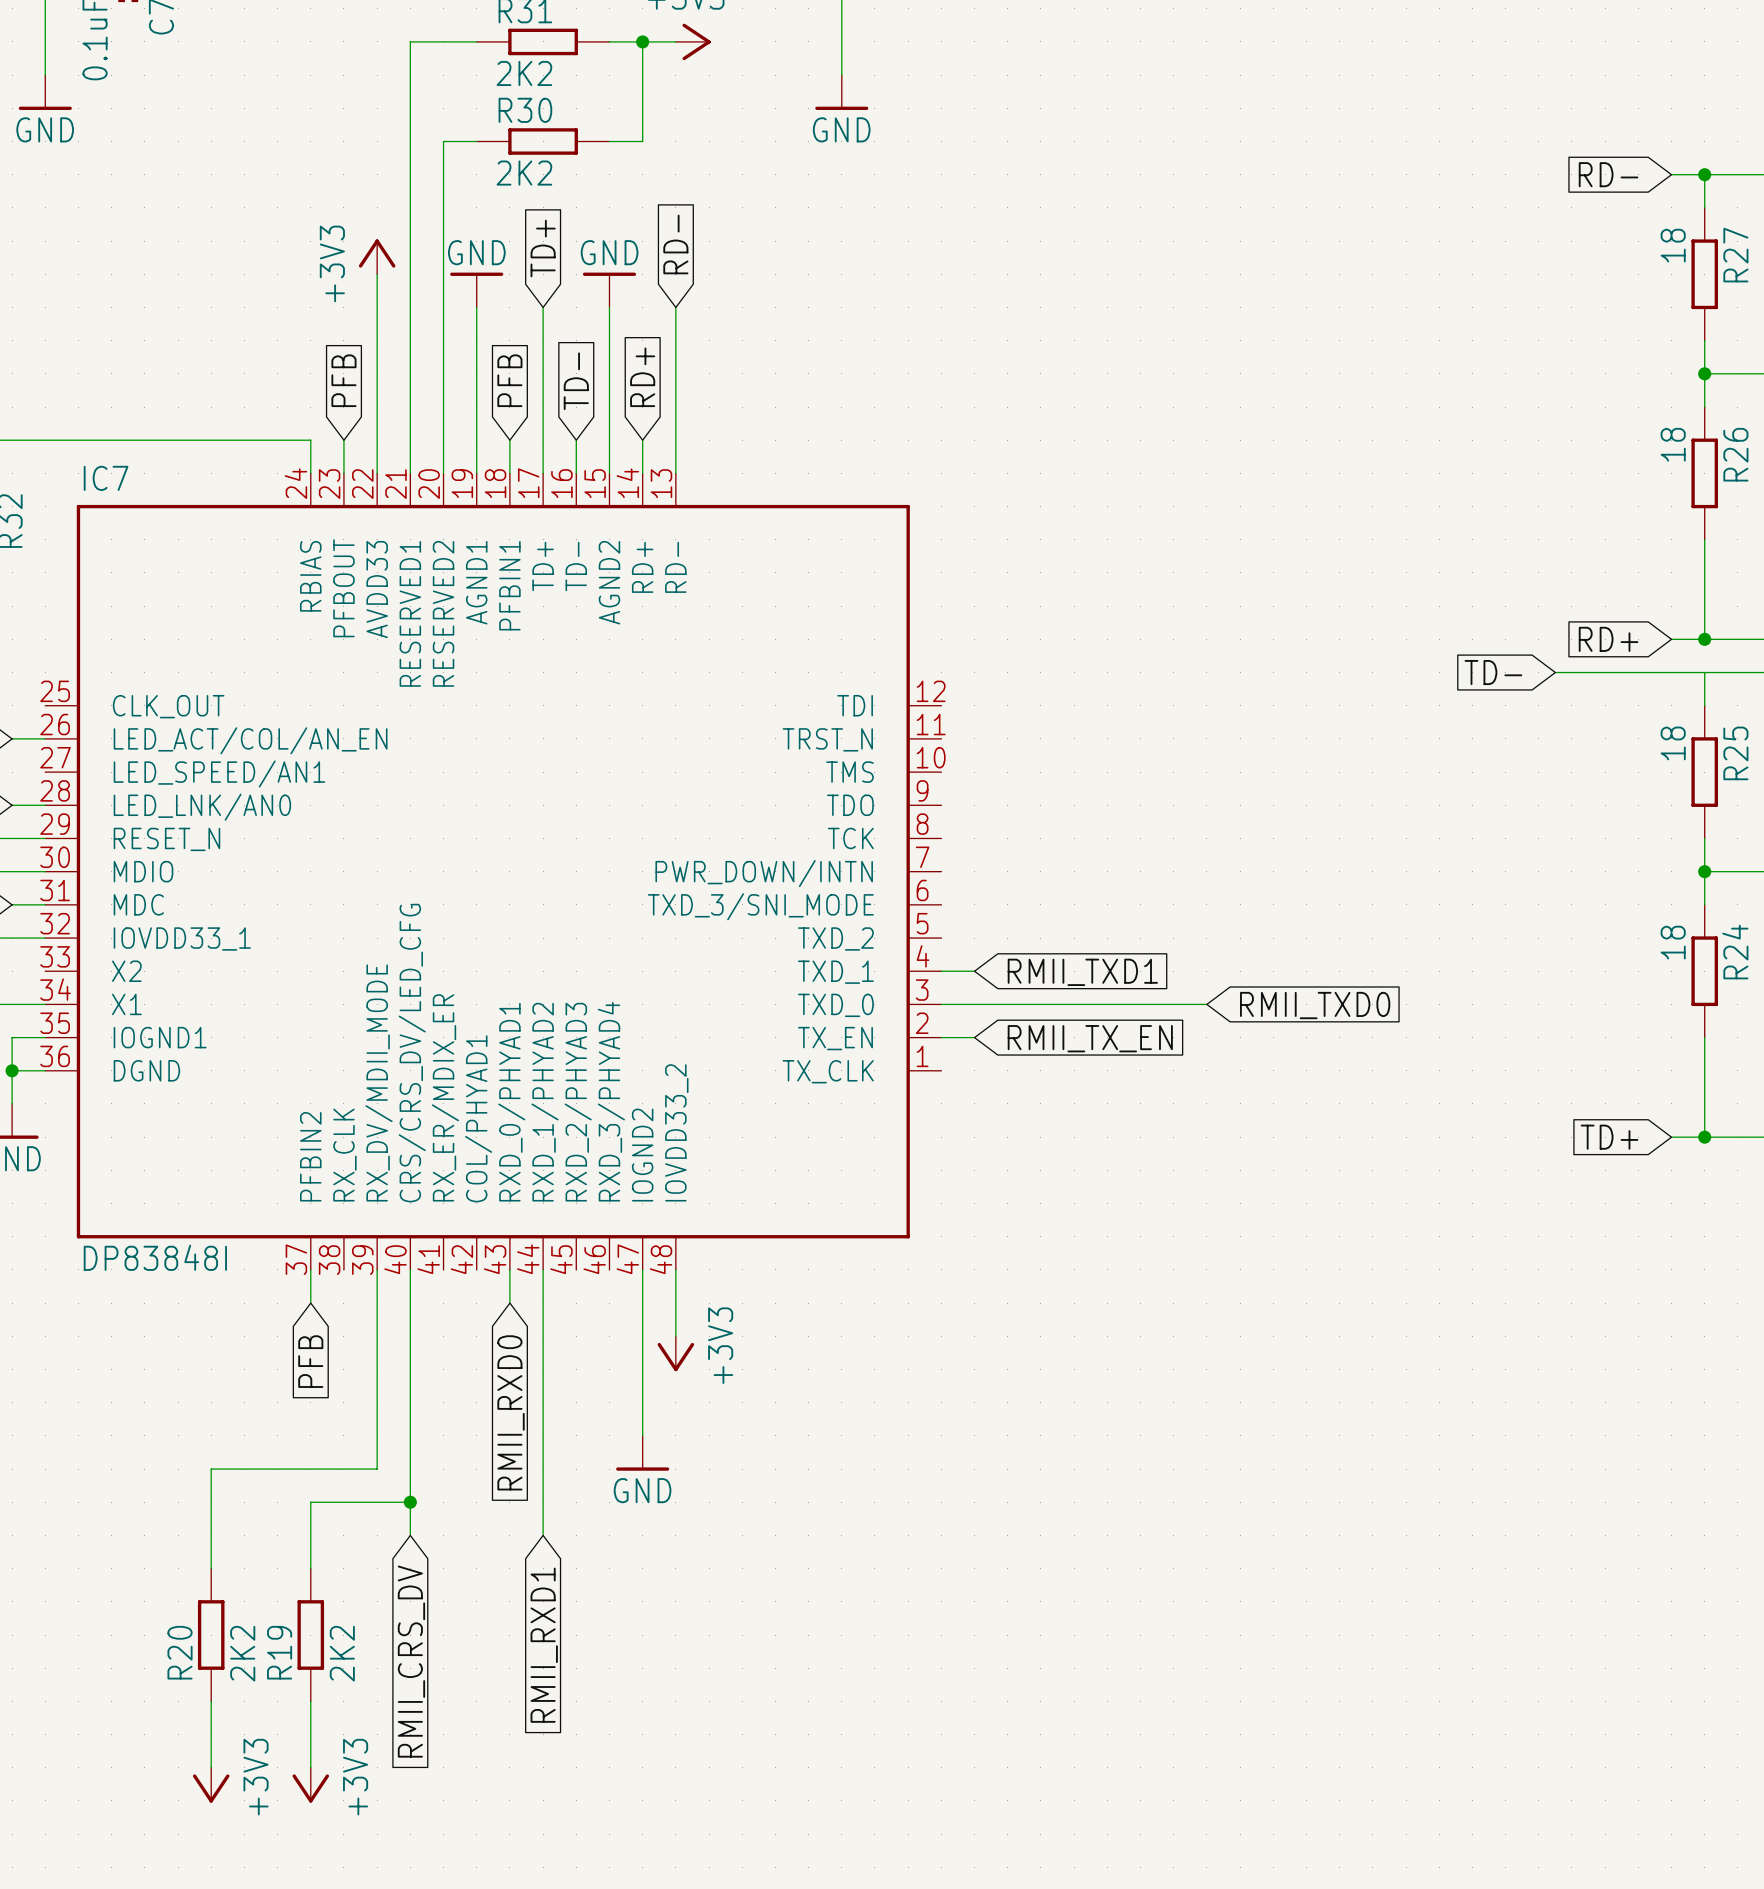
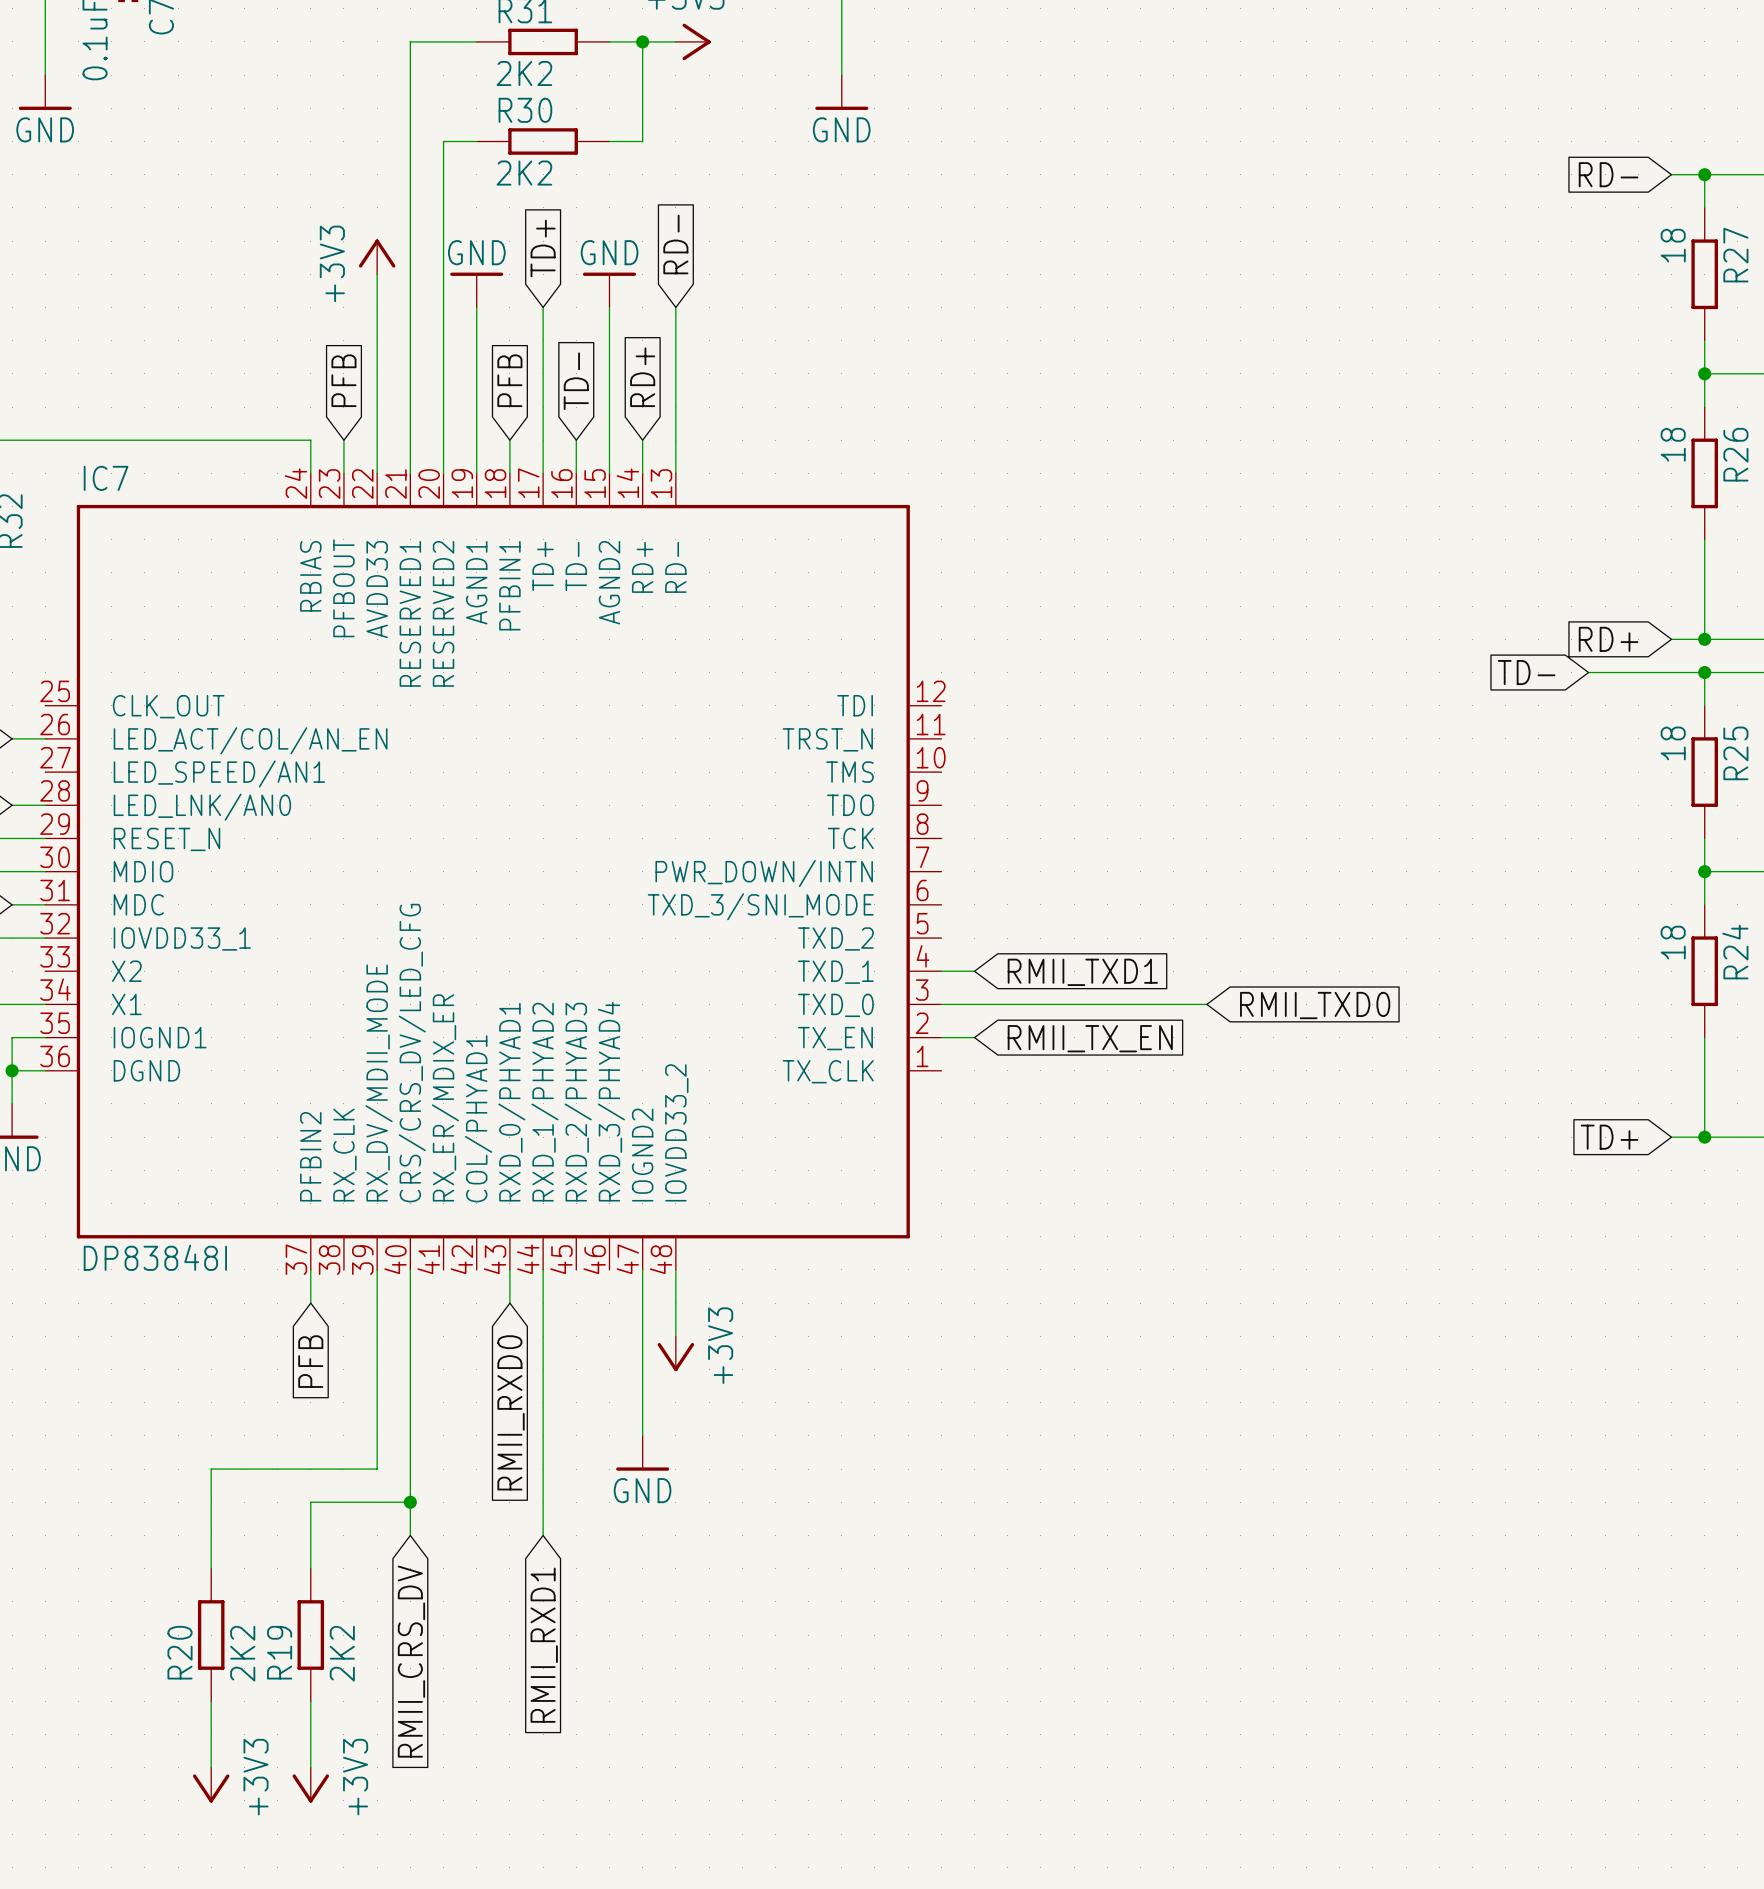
global label position: TD- (1493, 672) -> TD- (1526, 672)
wire: (1555, 672) (1588, 672) -> none
junction: none -> (1704, 672)

